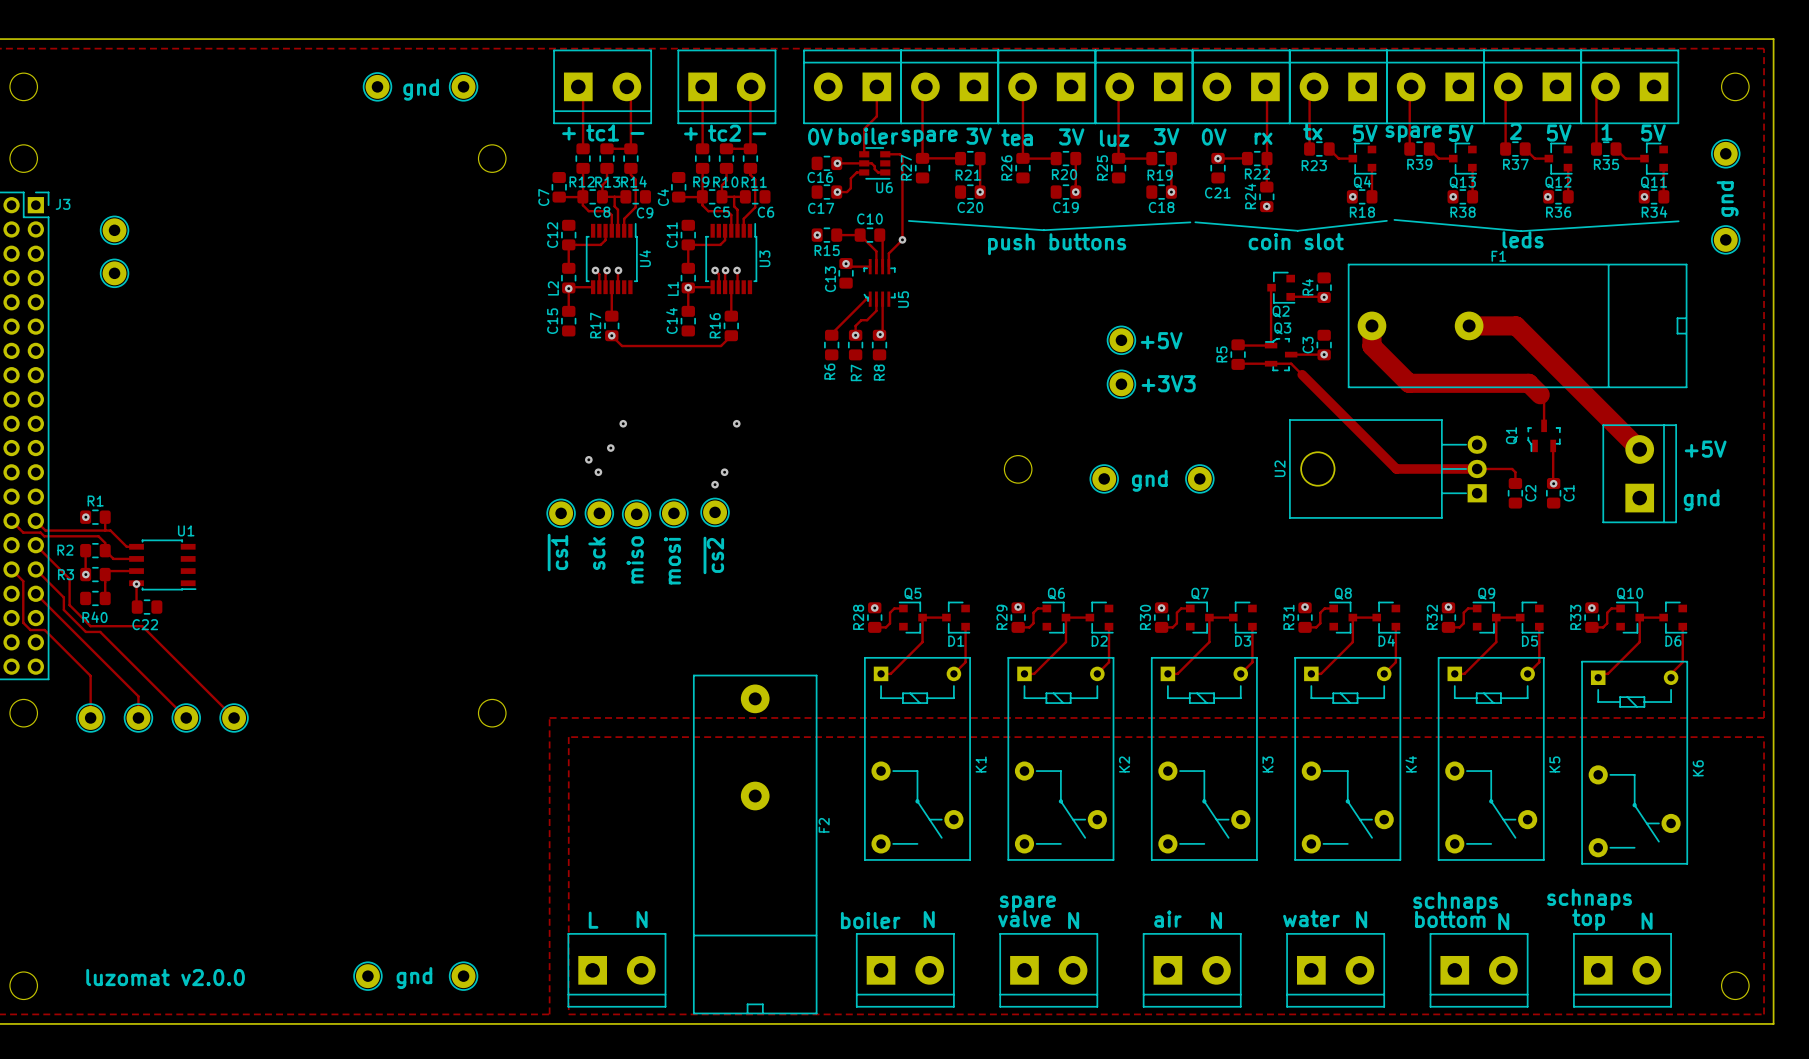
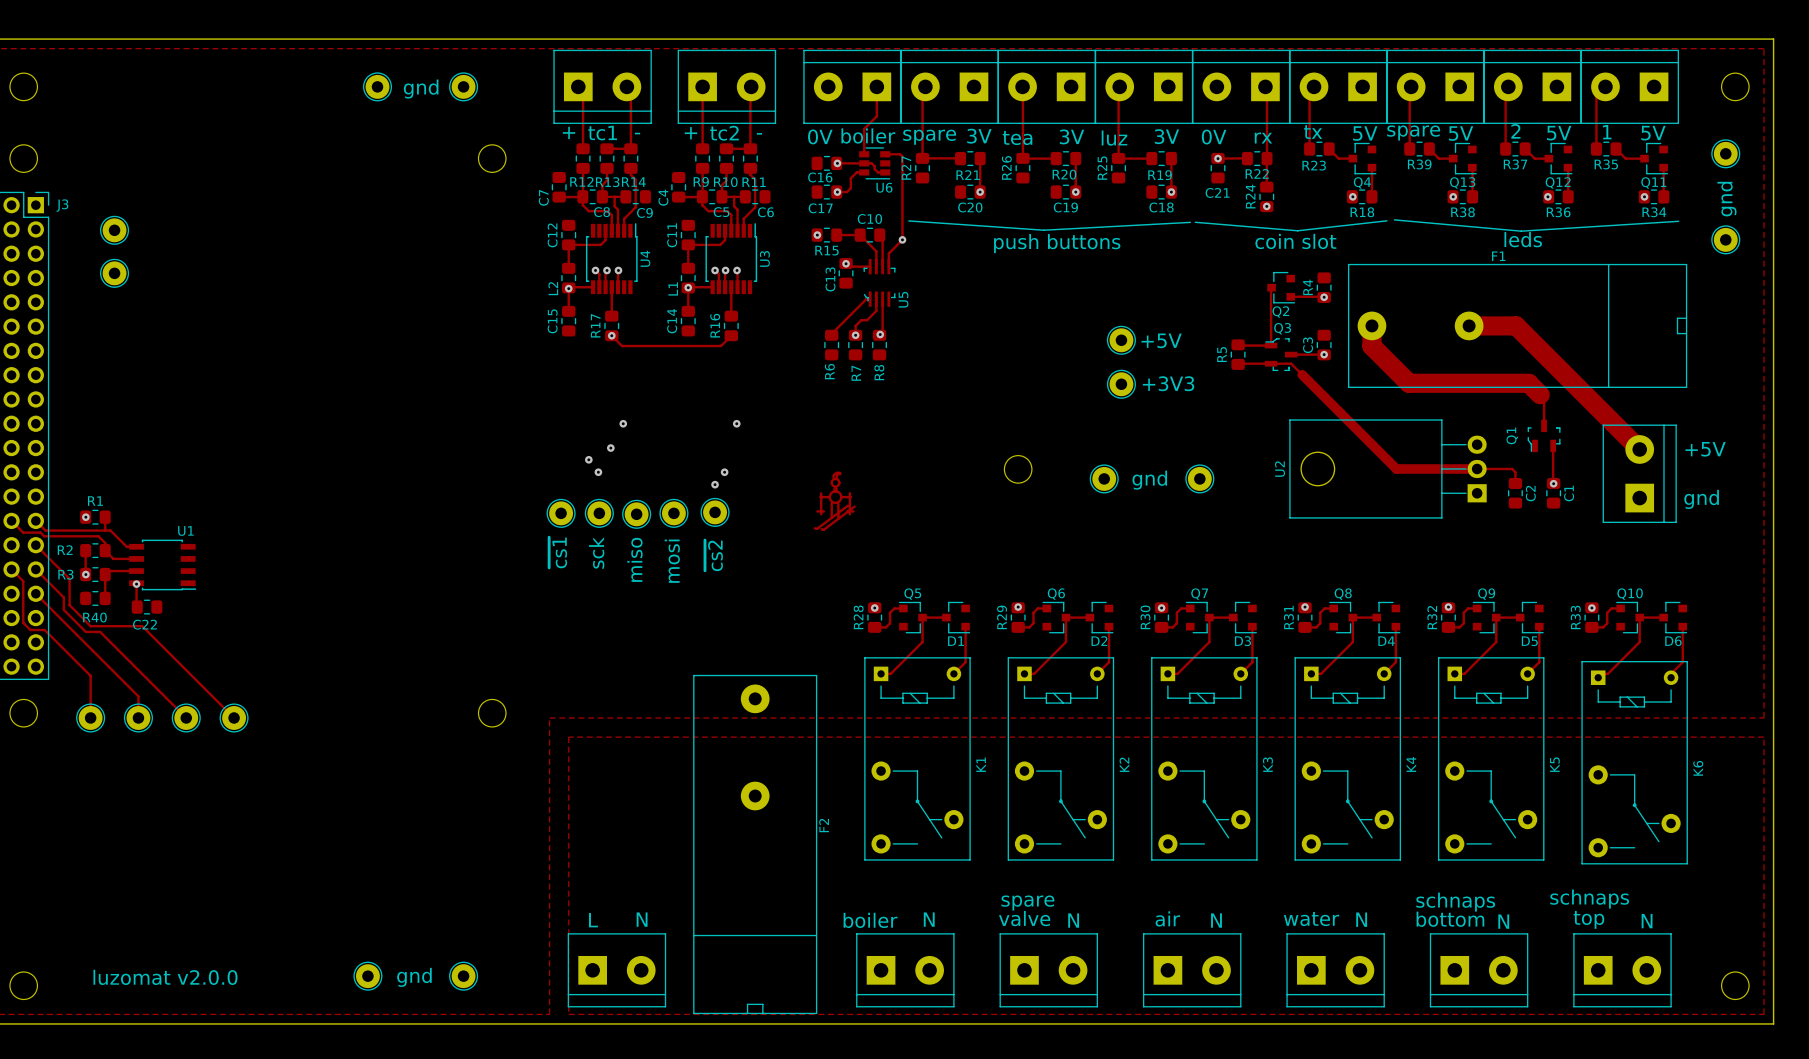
track: none -> (840, 473) (835, 473) (833, 477)
track: none -> (840, 474) (837, 475) (837, 478)
track: none -> (839, 482) (835, 478) (831, 482) (835, 486) (839, 482)
track: none -> (834, 488) (834, 491)
track: none -> (836, 488) (836, 491)
track: none -> (821, 493) (821, 514)
track: none -> (849, 493) (849, 514)
track: none -> (820, 497) (829, 497)
track: none -> (841, 497) (850, 497)
track: none -> (841, 497) (839, 493) (835, 491) (831, 493) (829, 497) (831, 501) (835, 502) (839, 501) (841, 497)
track: none -> (831, 503) (831, 517)
track: none -> (838, 503) (838, 518)
track: none -> (847, 505) (817, 528) (814, 528)
track: none -> (854, 506) (824, 529) (821, 529)
track: none -> (817, 511) (824, 511)
track: none -> (847, 511) (853, 511)

